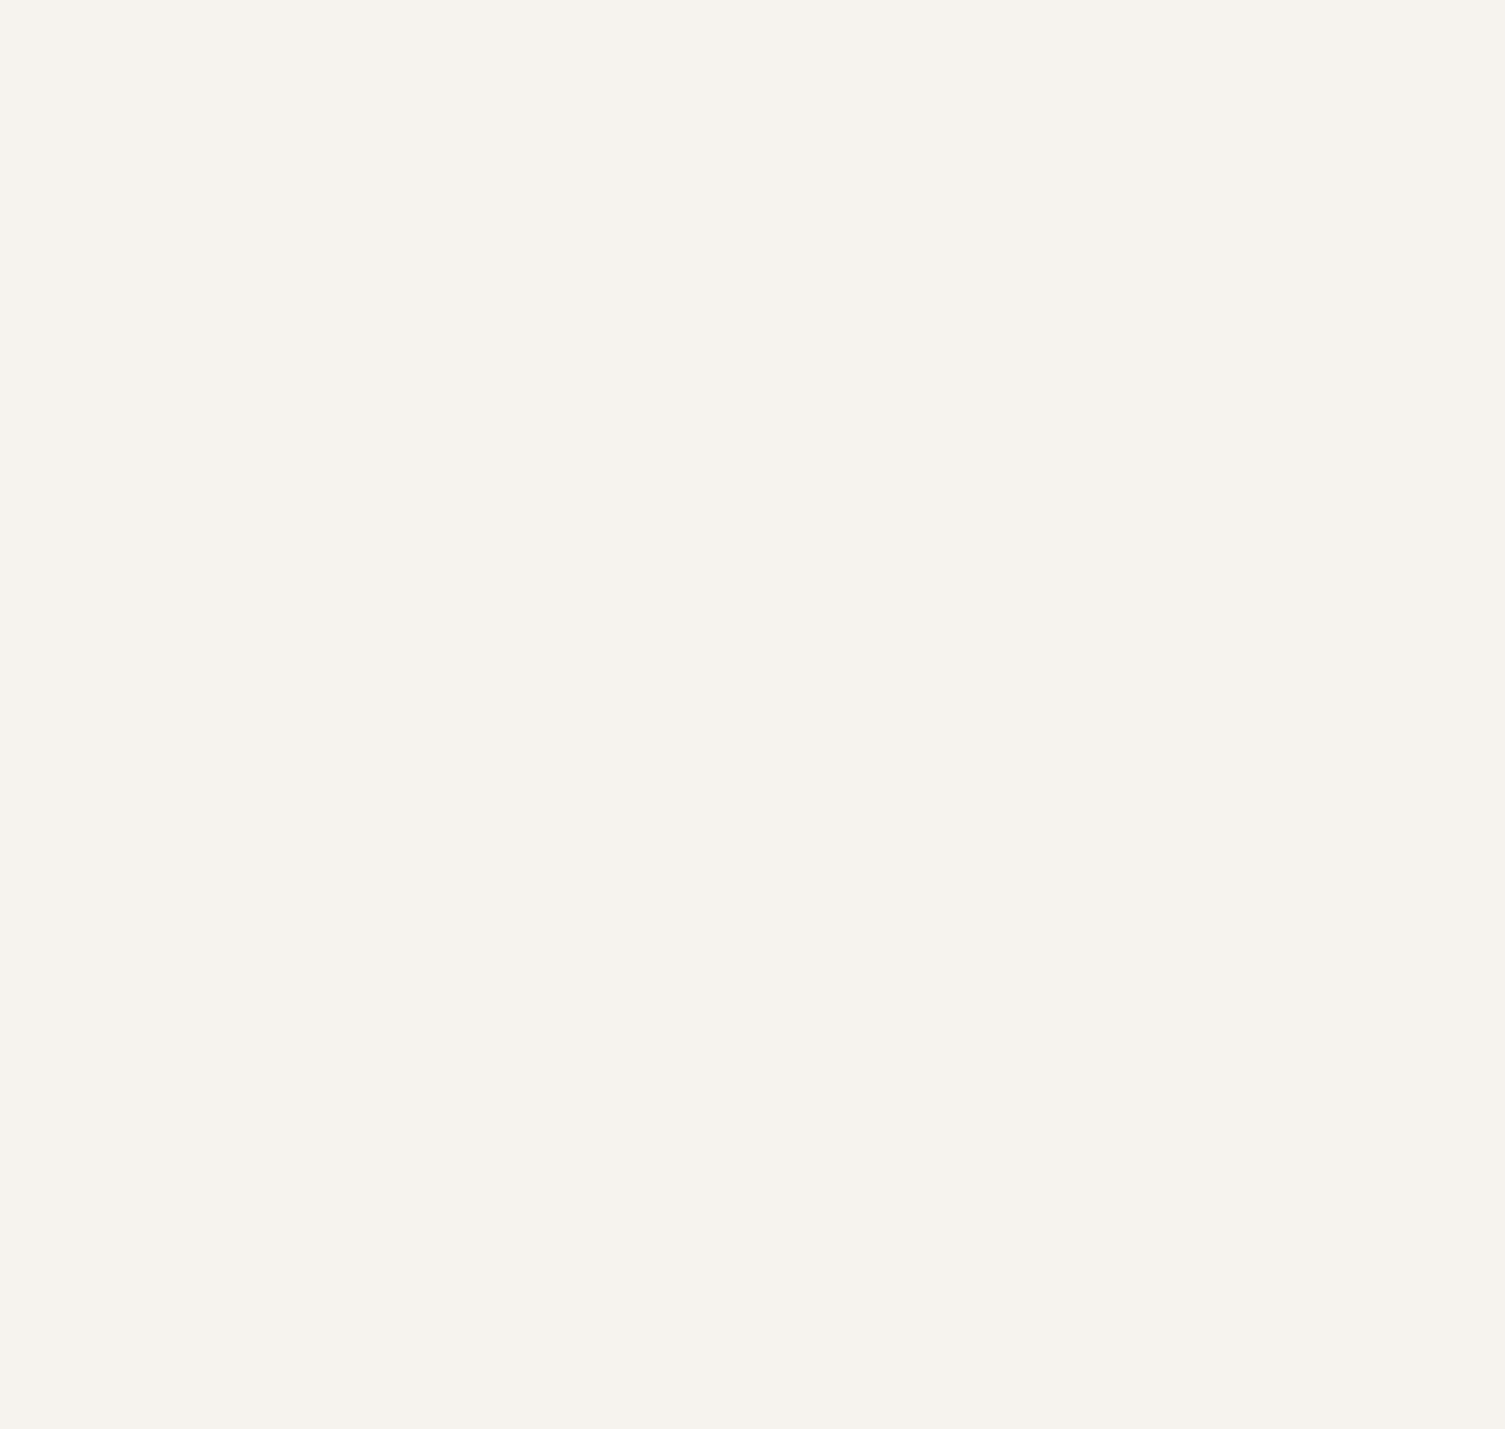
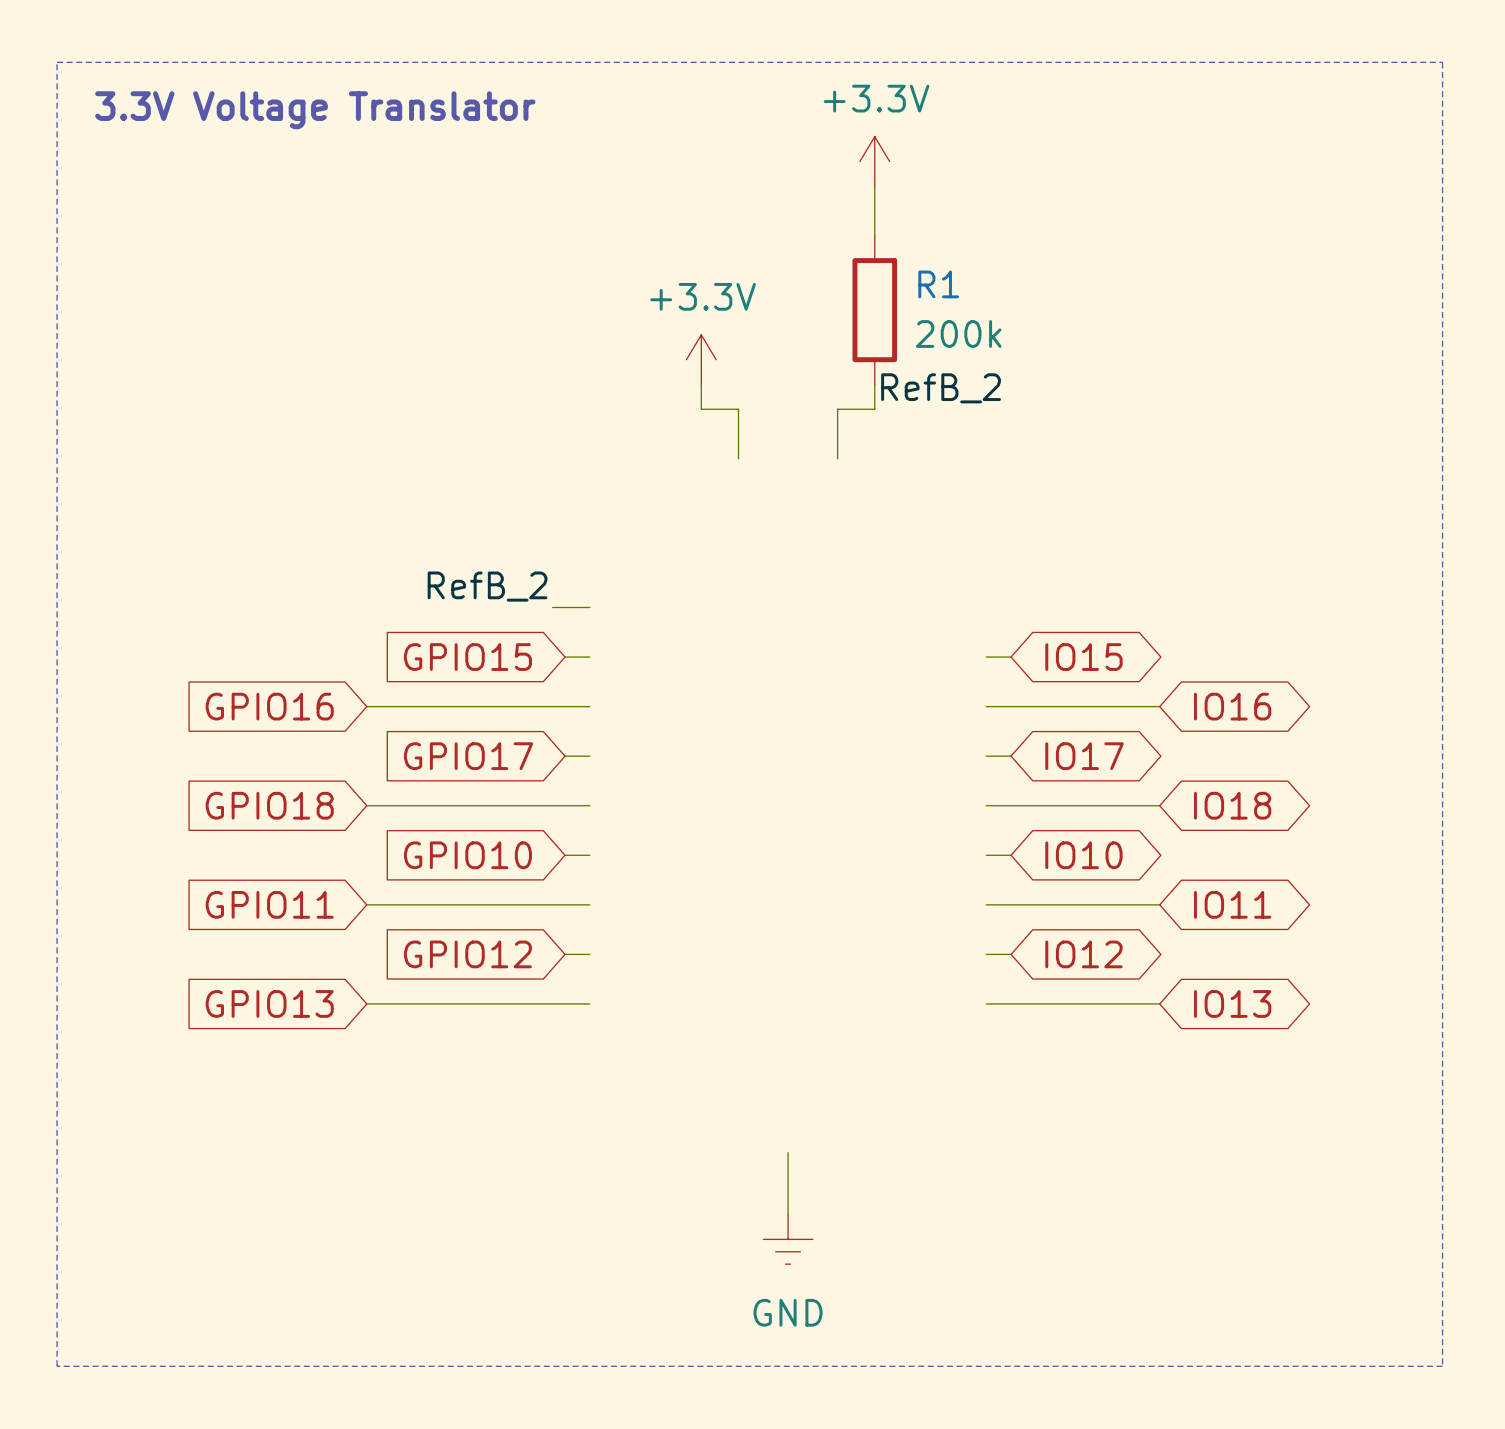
line: none -> (57, 62) (1442, 62) (1442, 1366) (57, 1366) (57, 62)
text: none -> 3.3V Voltage Translator (315, 110)
power symbol: none -> +3.3V (874, 161)
wire: none -> (874, 186) (874, 235)
R1: none -> 200k (874, 310)
power symbol: none -> +3.3V (701, 359)
wire: none -> (701, 384) (701, 409) (738, 409) (738, 458)
wire: none -> (874, 384) (874, 409) (837, 409) (837, 458)
label: none -> RefB_2 (941, 388)
label: none -> RefB_2 (487, 586)
wire: none -> (552, 607) (589, 607)
global label: none -> GPIO15 (467, 657)
wire: none -> (565, 657) (589, 657)
wire: none -> (986, 657) (1011, 657)
global label: none -> IO15 (1083, 657)
global label: none -> GPIO16 (269, 706)
wire: none -> (366, 706) (589, 706)
wire: none -> (986, 706) (1159, 706)
global label: none -> IO16 (1232, 706)
global label: none -> GPIO17 (468, 756)
wire: none -> (565, 756) (589, 756)
wire: none -> (986, 756) (1011, 756)
global label: none -> IO17 (1084, 756)
global label: none -> GPIO18 (269, 805)
wire: none -> (366, 805) (589, 805)
wire: none -> (986, 805) (1159, 805)
global label: none -> IO18 (1232, 805)
global label: none -> GPIO10 (467, 855)
wire: none -> (565, 855) (589, 855)
wire: none -> (986, 855) (1011, 855)
global label: none -> IO10 (1083, 855)
global label: none -> GPIO11 (269, 904)
wire: none -> (366, 904) (589, 904)
wire: none -> (986, 904) (1159, 904)
global label: none -> IO11 (1232, 904)
global label: none -> GPIO12 (467, 954)
wire: none -> (565, 954) (589, 954)
wire: none -> (986, 954) (1011, 954)
global label: none -> IO12 (1083, 954)
global label: none -> GPIO13 (269, 1003)
wire: none -> (366, 1003) (589, 1003)
wire: none -> (986, 1003) (1159, 1003)
global label: none -> IO13 (1232, 1003)
wire: none -> (788, 1152) (788, 1214)
power symbol: none -> GND (788, 1239)

